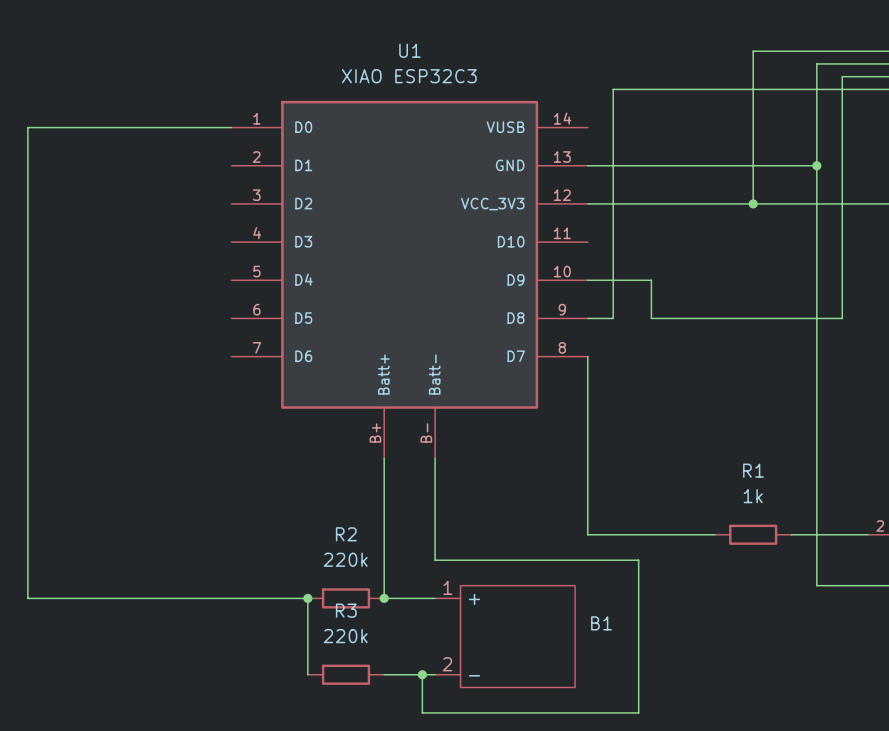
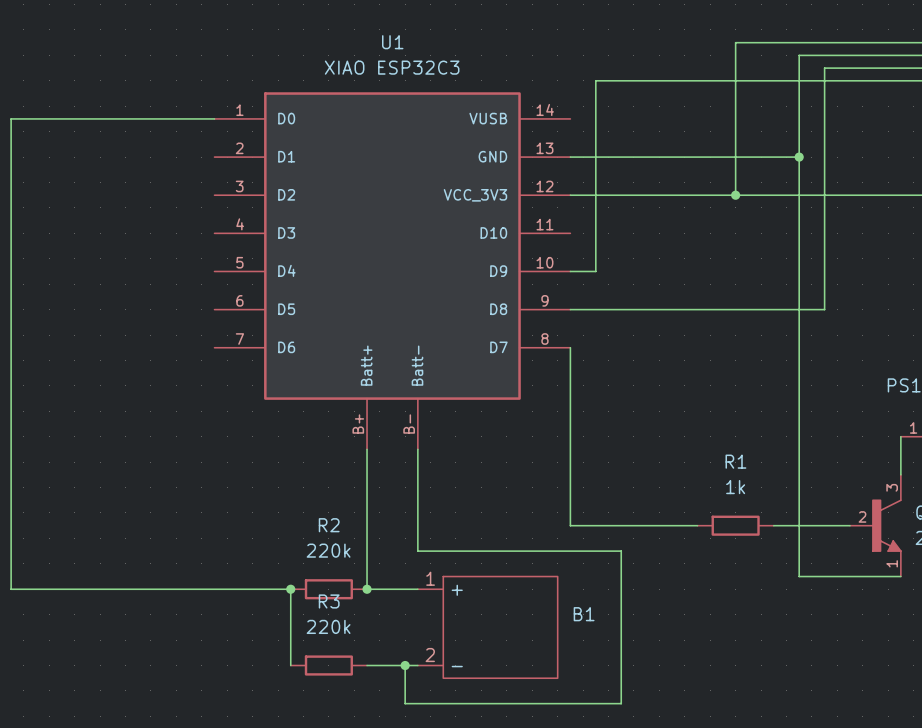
wire: (613, 318) (613, 280) (651, 280) (651, 318) -> (595, 309) (633, 309)

